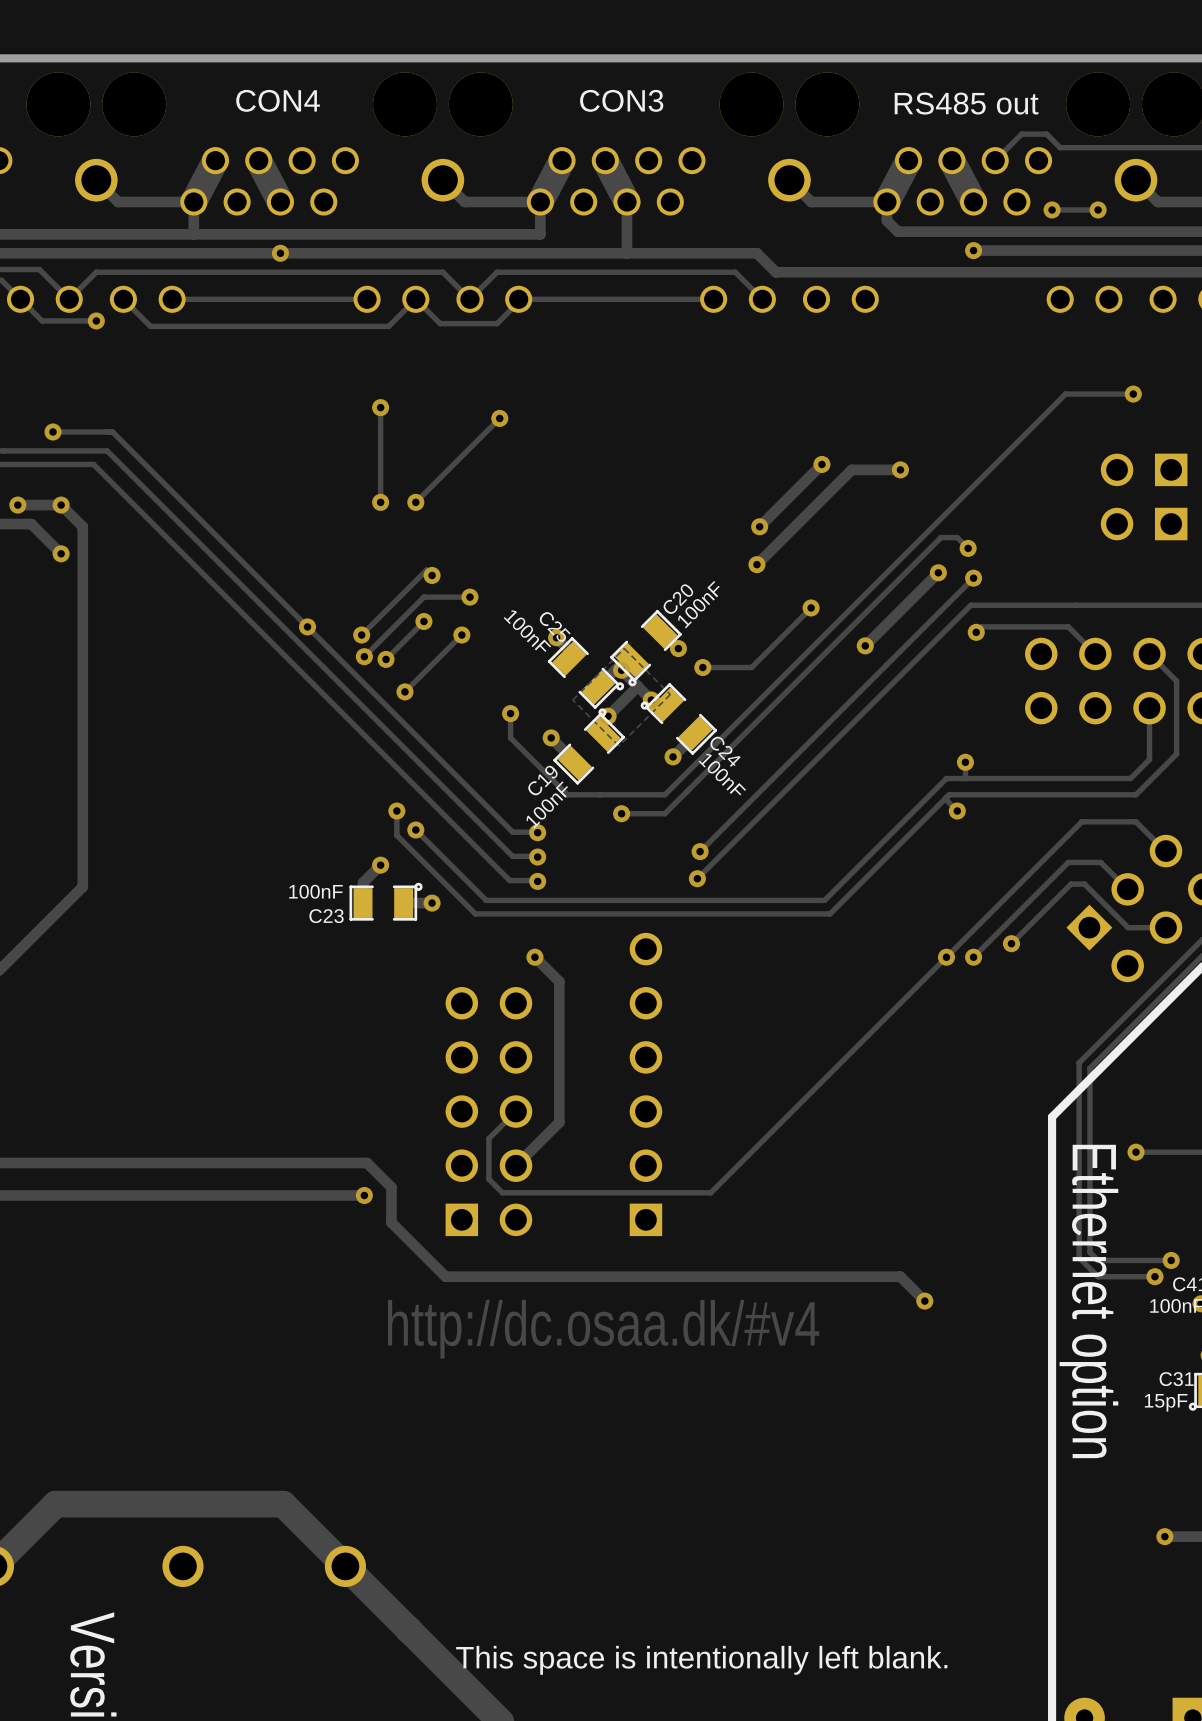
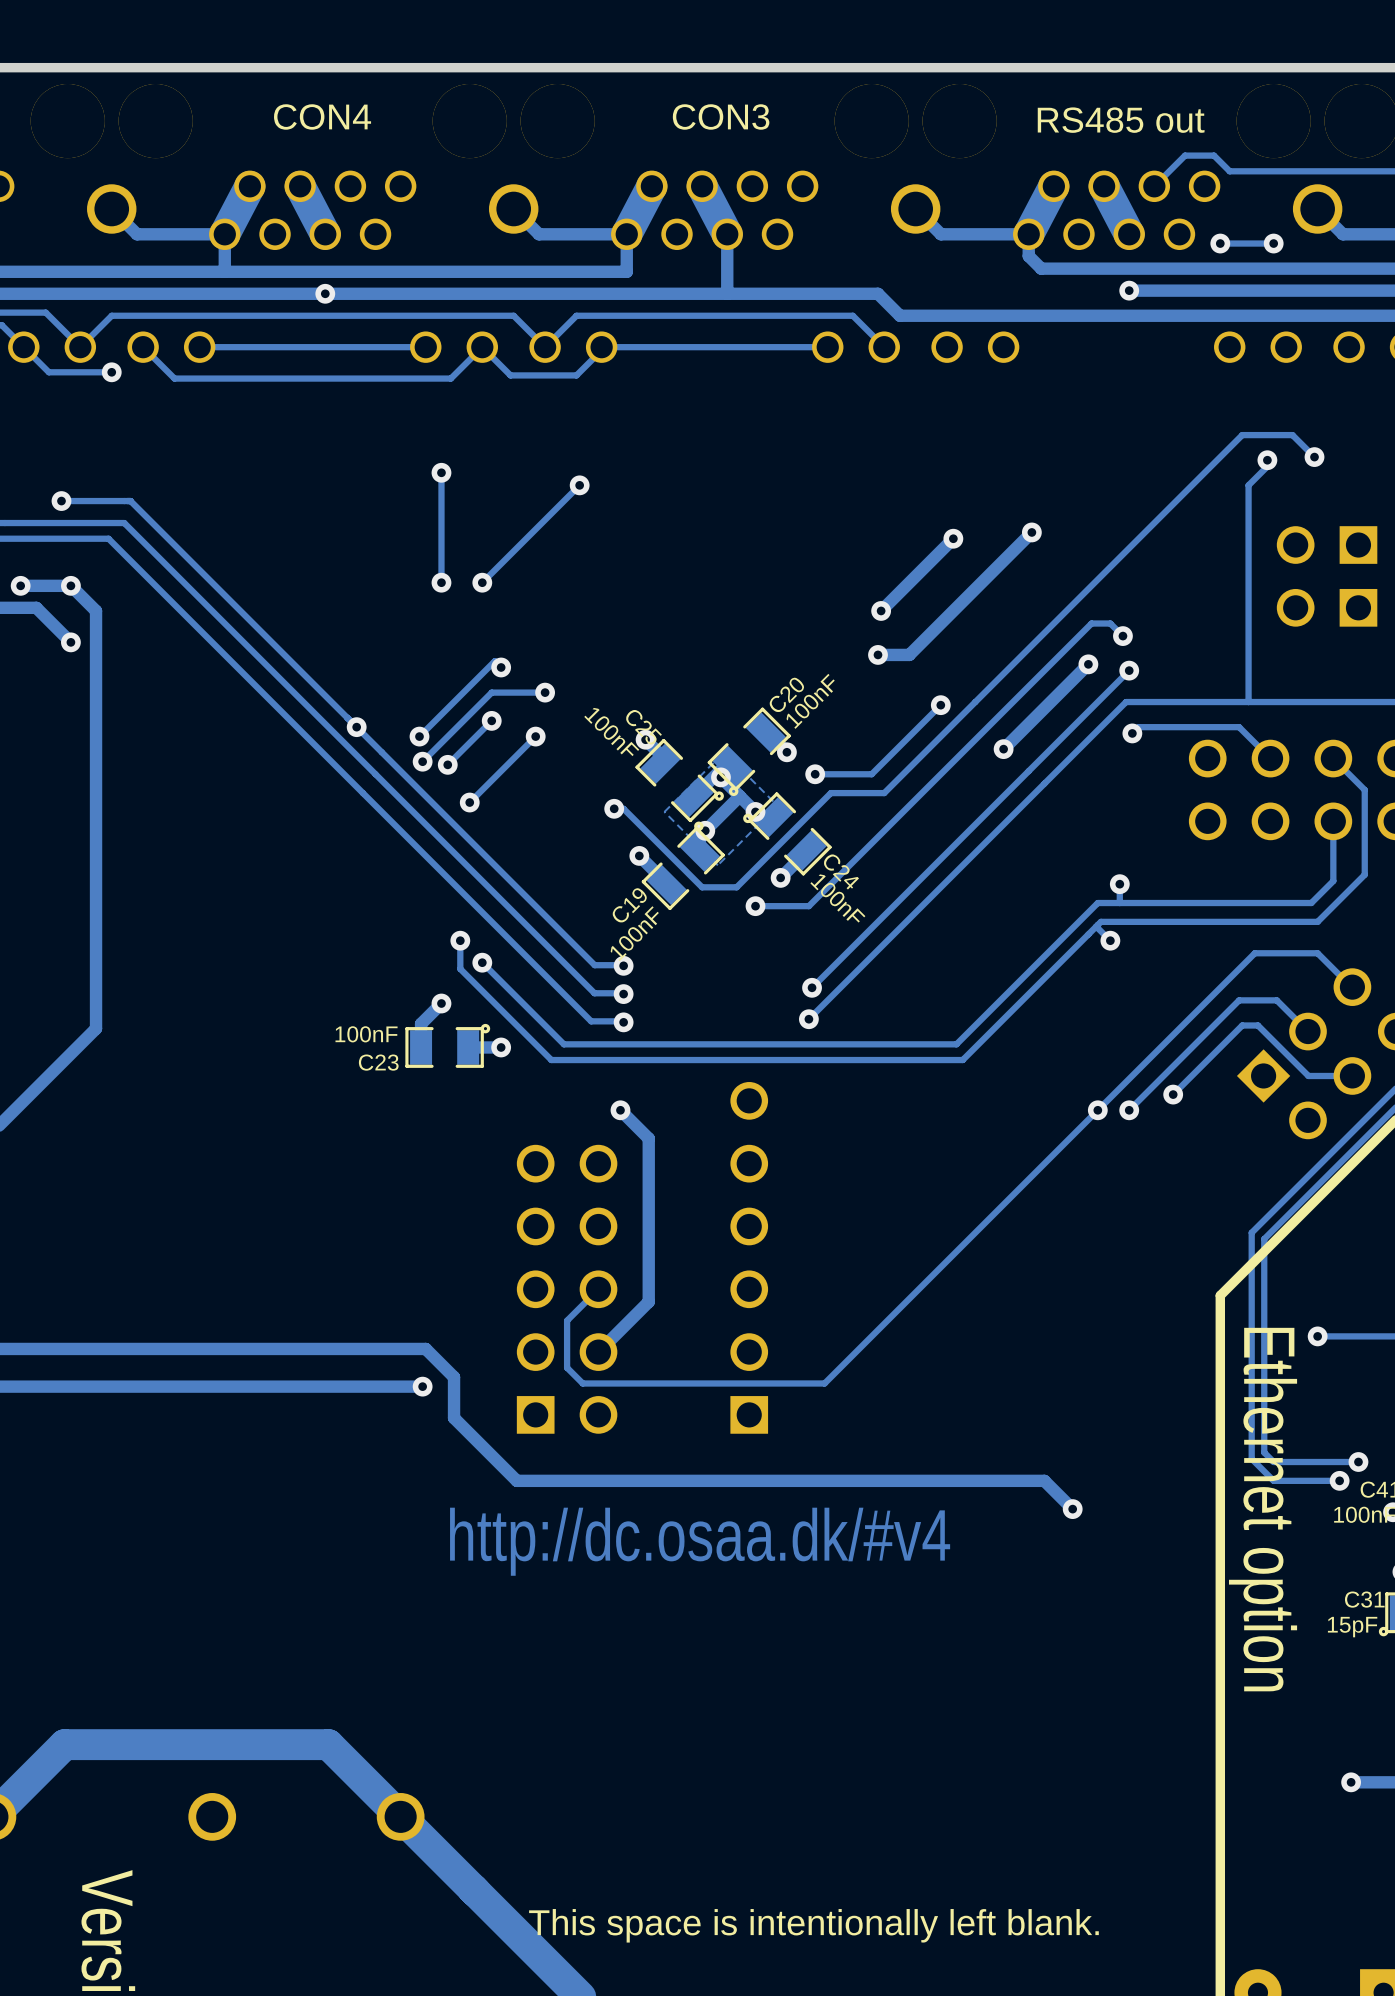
track: (1133, 394) (1065, 394) (664, 794) (567, 794) (510, 737) (510, 713) -> (1314, 457) (1292, 435) (1242, 435) (884, 793) (830, 793) (736, 887) (702, 887) (623, 808) (614, 808) (617, 805)
track: none -> (1267, 460) (1267, 466) (1248, 485) (1248, 702)
via: none -> (1267, 460)
track: (900, 469) (851, 469) (756, 564) -> (1031, 532) (909, 654) (877, 654)
via position: (900, 469) -> (1031, 532)
via position: (510, 713) -> (614, 808)
track: (697, 781) (664, 813) (621, 813) -> (808, 906) (755, 906)
via position: (621, 813) -> (755, 906)

